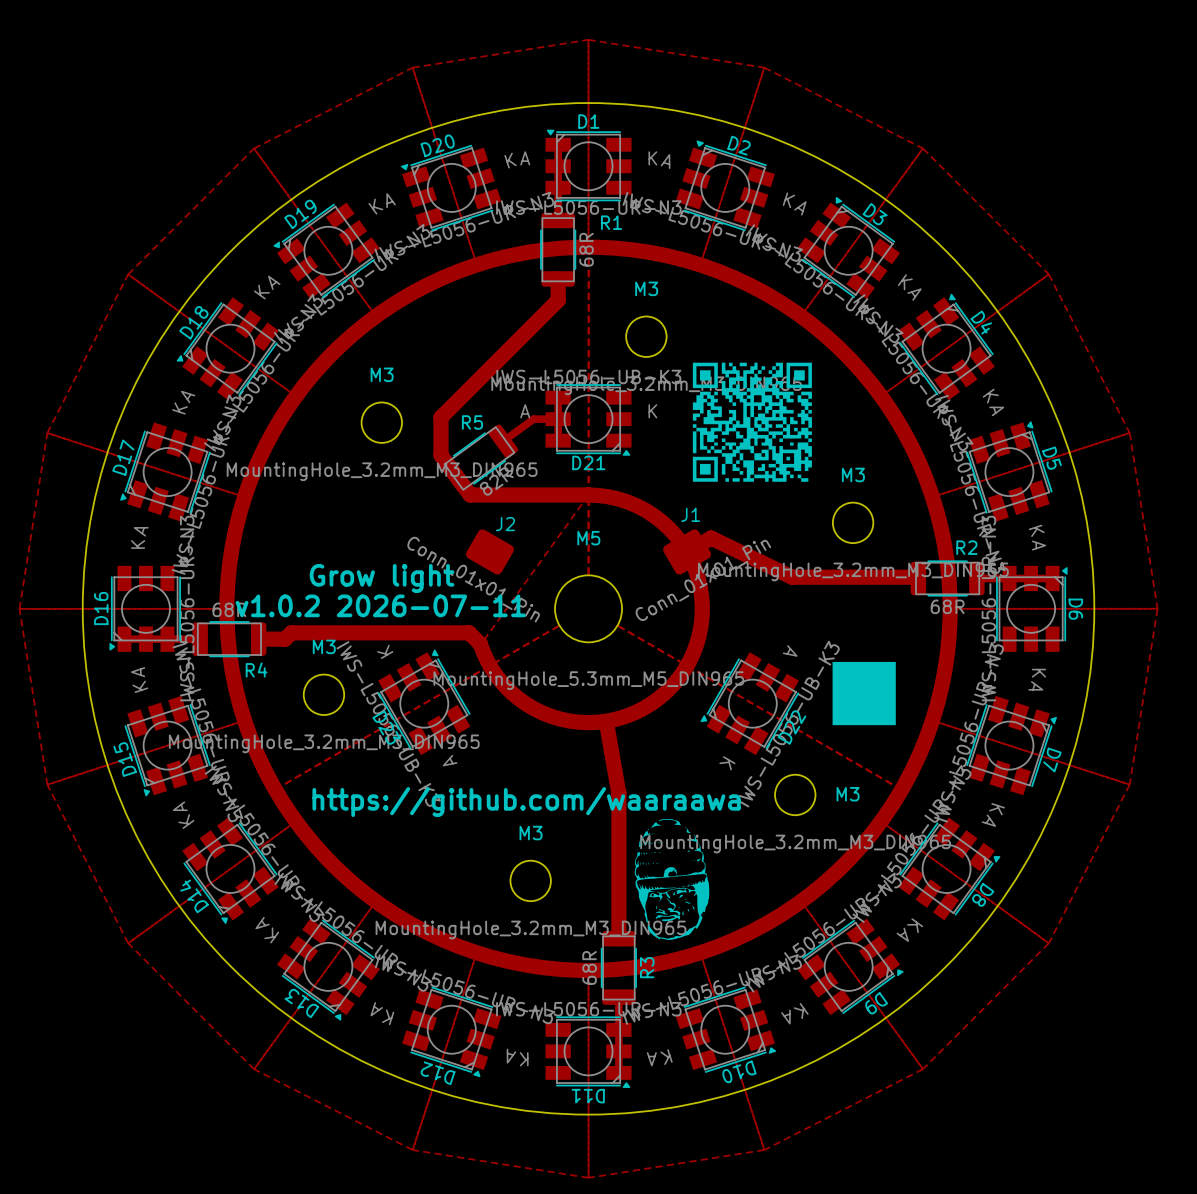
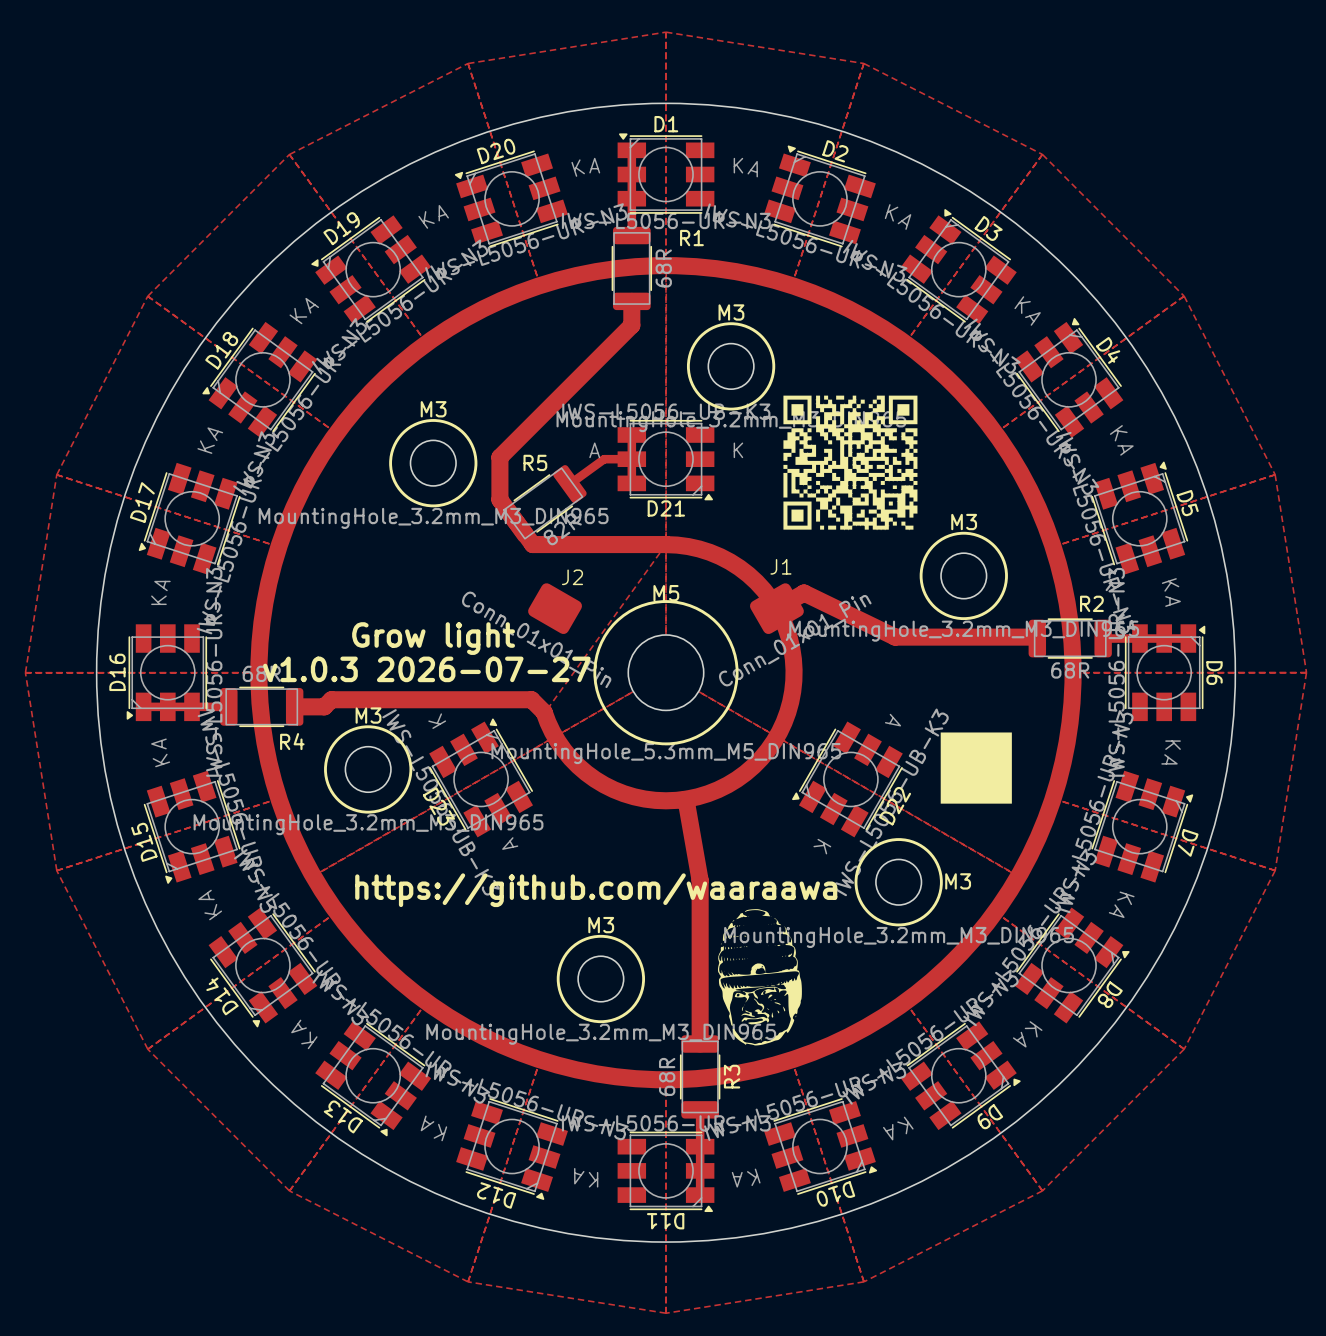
drawing: none -> [686, 322, 776, 411]
drawing: none -> [389, 419, 478, 508]
drawing: none -> [919, 531, 1008, 621]
drawing: none -> [593, 600, 739, 746]
text: v1.0.2 2026-07-11 (380, 605) -> v1.0.3 2026-07-27 (426, 669)
drawing: none -> [324, 725, 413, 814]
drawing: none -> [854, 838, 943, 927]
drawing: none -> [556, 934, 646, 1024]

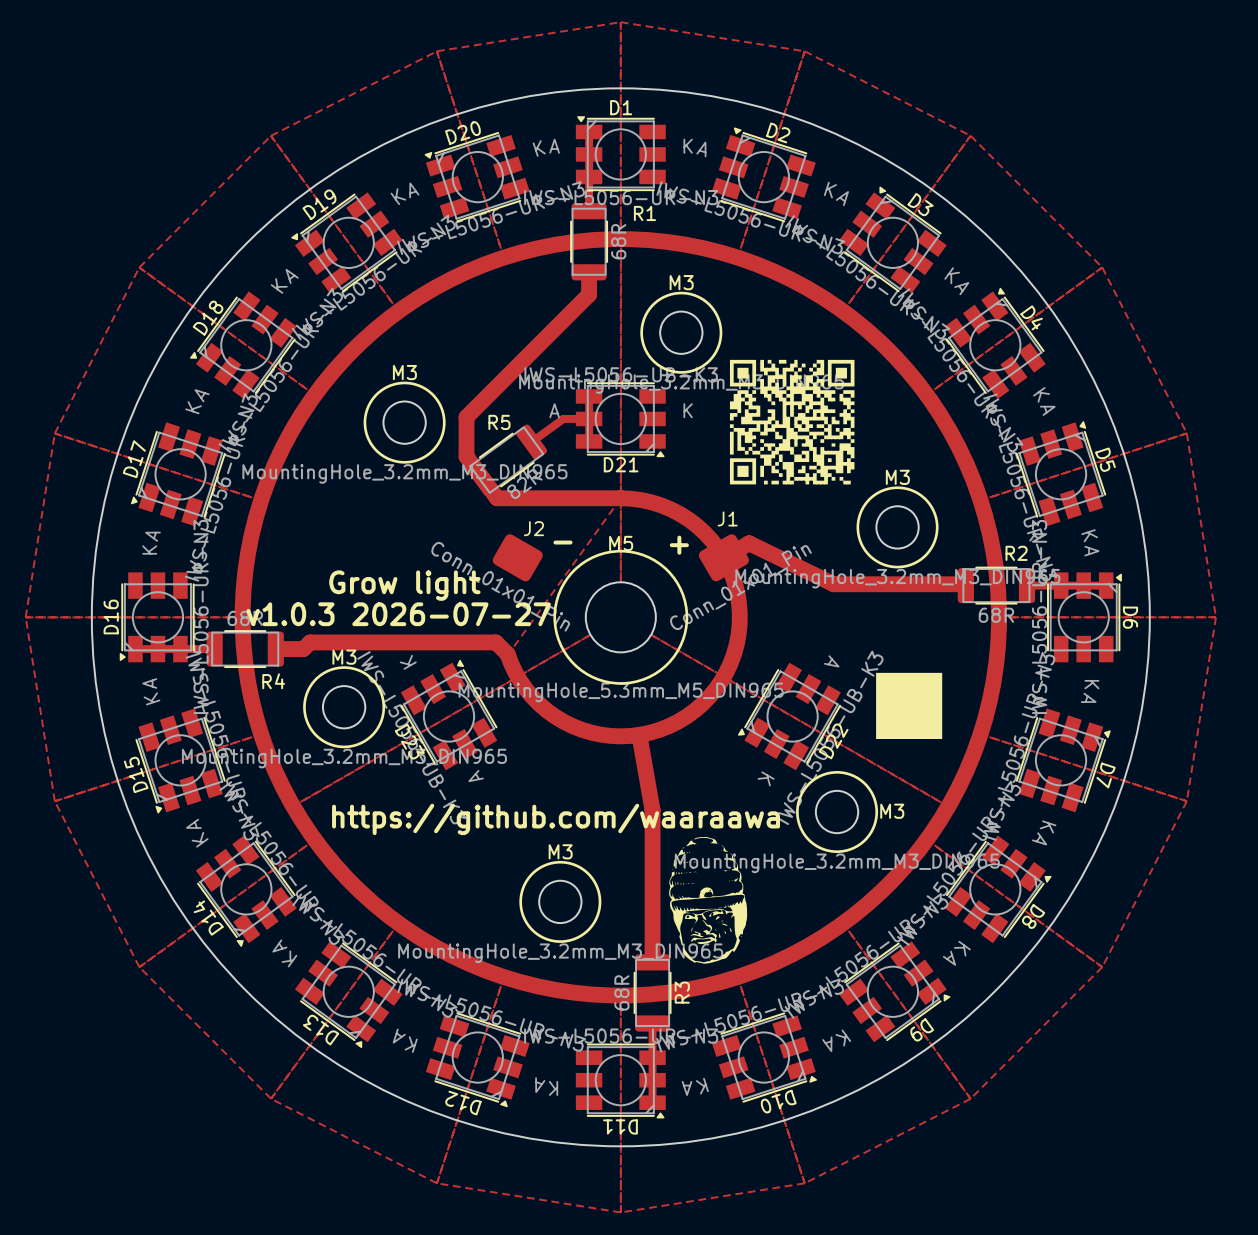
text: none -> - (562, 542)
text: none -> + (679, 545)

